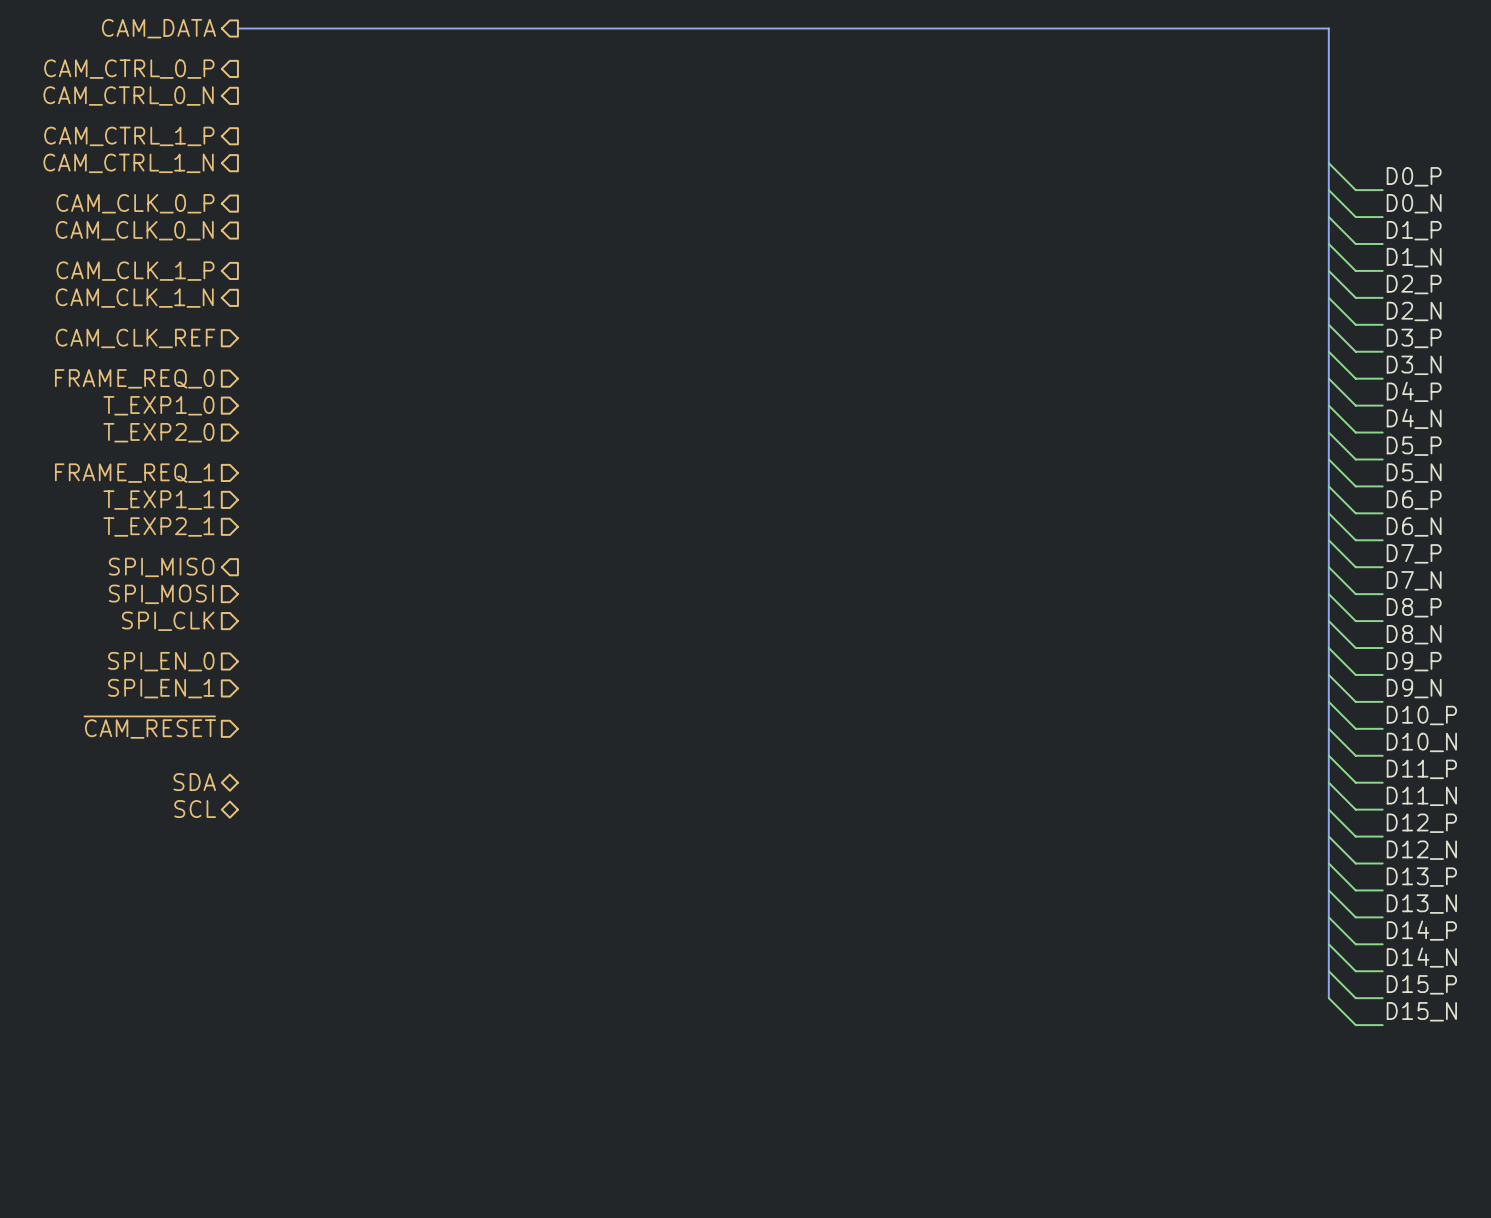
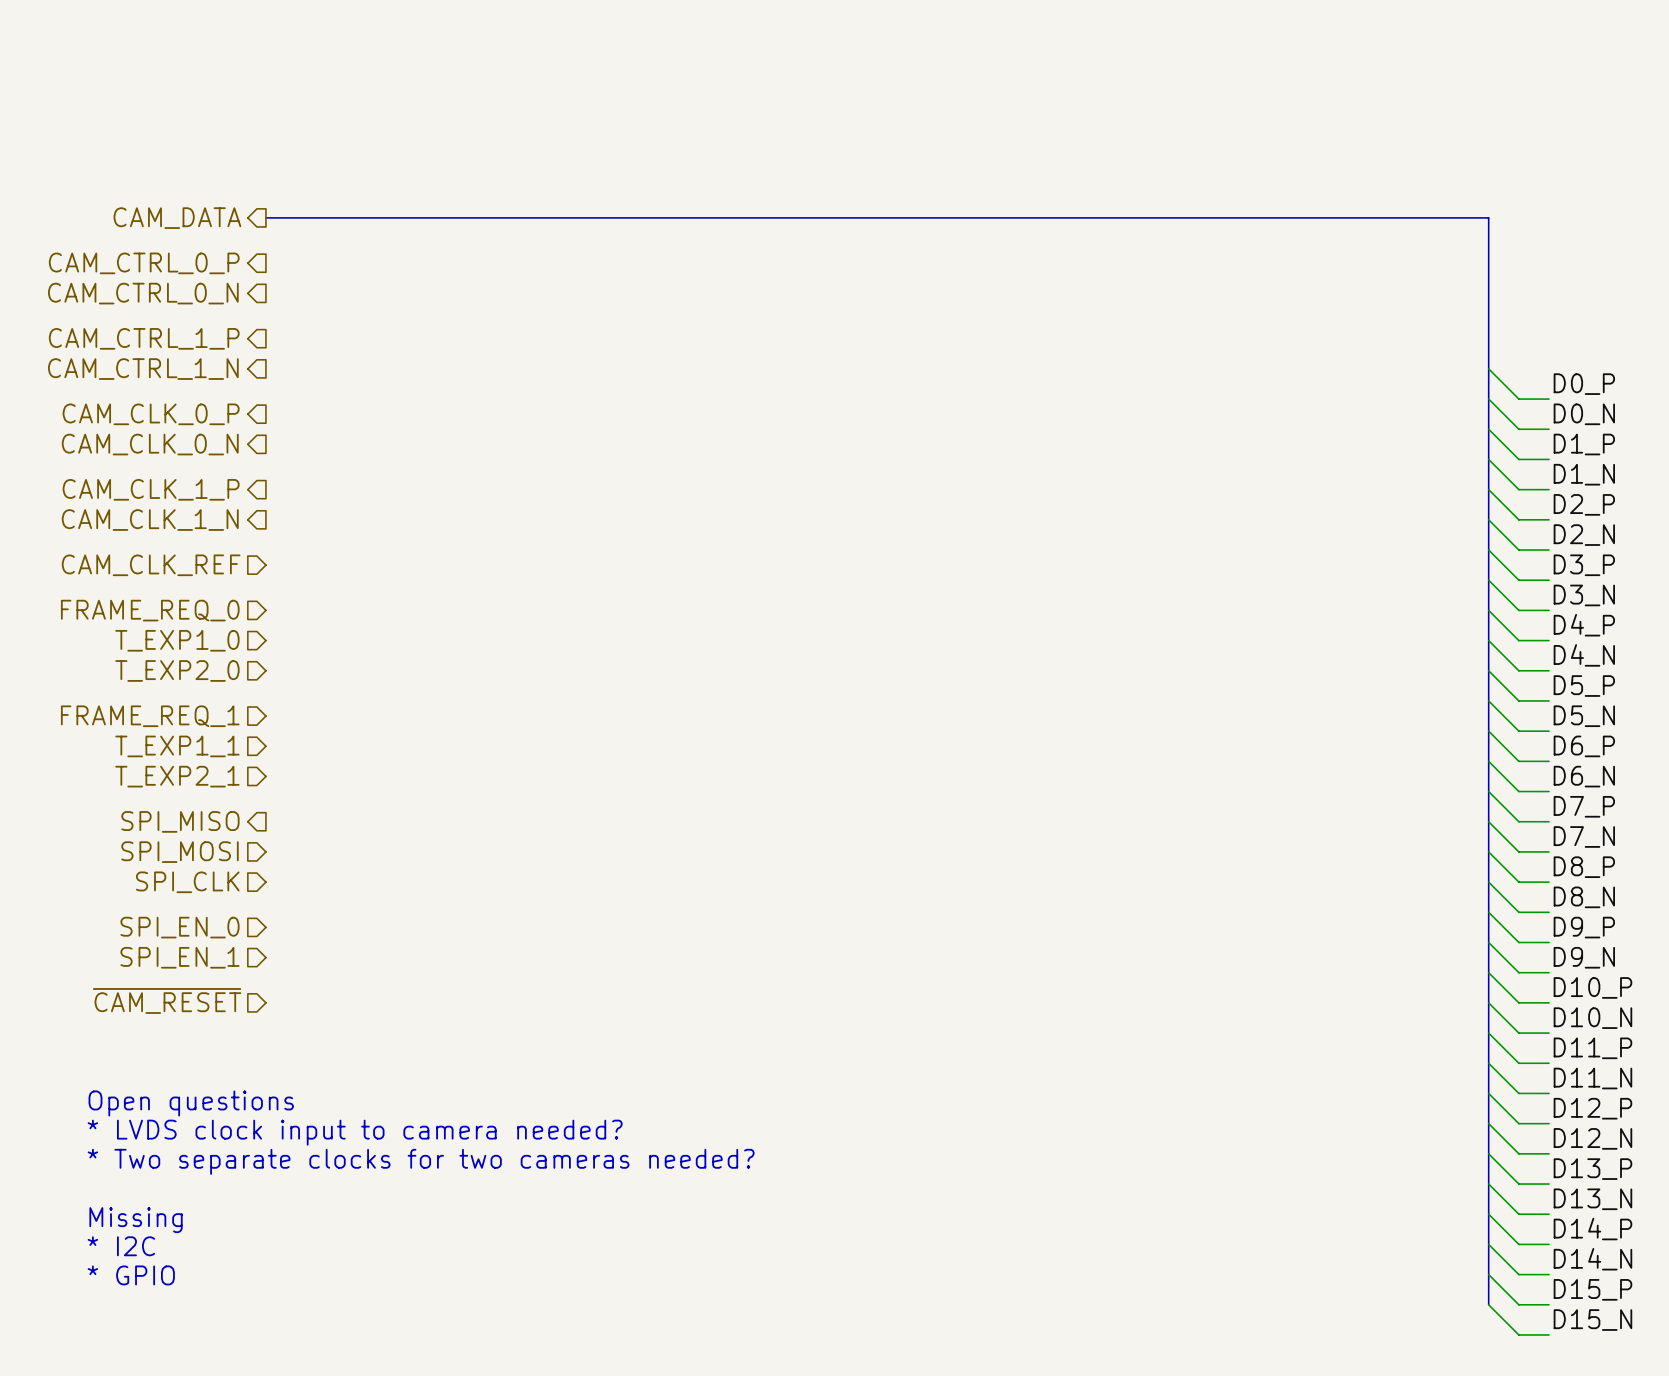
hierarchical label position: CAM_DATA (158, 28) -> CAM_DATA (177, 218)
bus: (237, 28) (1328, 28) (1328, 190) -> (265, 217) (1488, 217)
hierarchical label: CAM_CTRL_0_P (129, 69) -> none
hierarchical label position: CAM_CTRL_0_N (128, 96) -> CAM_CTRL_0_N (143, 293)
hierarchical label: CAM_CTRL_1_P (129, 136) -> none
hierarchical label position: CAM_CTRL_1_N (128, 163) -> CAM_CTRL_1_N (143, 369)
wire: (1328, 163) (1355, 190) (1382, 190) -> none
label: D0_P (1414, 176) -> none
wire: (1328, 190) (1355, 217) (1382, 217) -> none
hierarchical label position: CAM_CLK_0_P (135, 203) -> CAM_CLK_0_P (151, 414)
label: D0_N (1414, 203) -> none
wire: (1328, 217) (1355, 243) (1382, 243) -> none
hierarchical label: CAM_CLK_0_N (134, 230) -> CAM_CTRL_0_P (144, 263)
label: D1_P (1414, 230) -> none
wire: (1328, 243) (1355, 270) (1382, 270) -> none
label: D1_N (1414, 257) -> none
wire: (1328, 270) (1355, 297) (1382, 297) -> none
hierarchical label: CAM_CLK_1_P (135, 271) -> none
label: D2_P (1414, 284) -> none
wire: (1328, 297) (1355, 324) (1382, 324) -> none
hierarchical label: CAM_CLK_1_N (134, 298) -> CAM_CTRL_1_P (144, 338)
label: D2_N (1414, 311) -> none
hierarchical label: CAM_CLK_REF (135, 338) -> none
label: D3_P (1414, 338) -> D0_P (1584, 384)
label: D3_N (1414, 365) -> D0_N (1584, 414)
hierarchical label position: FRAME_REQ_0 (134, 378) -> FRAME_REQ_0 (150, 610)
label: D4_P (1414, 391) -> D1_P (1584, 444)
hierarchical label: none -> CAM_CLK_0_N (150, 444)
hierarchical label: T_EXP1_0 (158, 405) -> none
label: D4_N (1414, 418) -> D1_N (1584, 474)
hierarchical label shape: input (158, 432) -> output (151, 489)
hierarchical label: T_EXP2_0 (158, 432) -> CAM_CLK_1_P (151, 489)
label: D5_P (1414, 446) -> D2_P (1584, 504)
hierarchical label: none -> CAM_CLK_1_N (150, 520)
hierarchical label position: FRAME_REQ_1 (134, 473) -> FRAME_REQ_1 (150, 716)
label: D5_N (1414, 473) -> D2_N (1584, 535)
hierarchical label: T_EXP1_1 (158, 500) -> CAM_CLK_REF (151, 565)
label: D6_P (1414, 500) -> D3_P (1584, 565)
hierarchical label: T_EXP2_1 (158, 526) -> none
label: D6_N (1414, 526) -> D3_N (1584, 595)
label: D7_P (1414, 553) -> D4_P (1584, 625)
hierarchical label shape: output (161, 567) -> input (177, 640)
hierarchical label: SPI_MISO (161, 567) -> T_EXP1_0 (177, 640)
label: D7_N (1414, 580) -> D4_N (1584, 655)
hierarchical label: SPI_MOSI (161, 594) -> T_EXP2_0 (177, 670)
label: D8_P (1414, 607) -> D5_P (1584, 686)
hierarchical label: SPI_CLK (168, 621) -> none
label: D8_N (1414, 634) -> D5_N (1584, 716)
hierarchical label: SPI_EN_0 (161, 661) -> T_EXP1_1 (177, 746)
label: D9_P (1414, 661) -> D6_P (1584, 746)
hierarchical label: SPI_EN_1 (161, 688) -> T_EXP2_1 (177, 776)
label: D9_N (1414, 688) -> D6_N (1584, 776)
label: D10_P (1421, 715) -> D7_P (1584, 806)
hierarchical label shape: input (149, 727) -> output (180, 821)
hierarchical label: ~{CAM_RESET} (149, 727) -> SPI_MISO (180, 821)
label: D10_N (1421, 742) -> D7_N (1584, 836)
hierarchical label: none -> SPI_MOSI (180, 852)
label: D11_P (1421, 769) -> D8_P (1584, 867)
hierarchical label shape: bidirectional (194, 782) -> input (187, 882)
hierarchical label: SDA (194, 782) -> SPI_CLK (187, 882)
label: D11_N (1421, 796) -> D8_N (1584, 897)
hierarchical label: SCL (195, 809) -> none
hierarchical label: none -> SPI_EN_0 (180, 927)
label: D12_P (1421, 823) -> D9_P (1584, 927)
hierarchical label: none -> SPI_EN_1 (180, 957)
label: D12_N (1421, 850) -> D9_N (1584, 957)
label: D13_P (1421, 877) -> D10_P (1592, 987)
hierarchical label: none -> ~{CAM_RESET} (167, 1000)
label: D13_N (1421, 904) -> D10_N (1592, 1018)
label: D14_P (1421, 930) -> D11_P (1592, 1048)
label: D14_N (1421, 957) -> D11_N (1592, 1078)
text: none -> Open questions (191, 1103)
label: D15_P (1421, 984) -> D12_P (1592, 1108)
bus: none -> (1488, 1123) (1488, 1304)
text: none -> * LVDS clock input to camera needed? (355, 1132)
label: D15_N (1421, 1011) -> D12_N (1592, 1138)
wire: none -> (1488, 1153) (1518, 1184) (1549, 1184)
text: none -> * Two separate clocks for two cameras needed? (421, 1161)
label: none -> D13_P (1592, 1169)
wire: none -> (1488, 1184) (1518, 1214) (1549, 1214)
label: none -> D13_N (1592, 1199)
wire: none -> (1488, 1214) (1518, 1244) (1549, 1244)
text: none -> Missing (136, 1220)
label: none -> D14_P (1592, 1229)
wire: none -> (1488, 1244) (1518, 1274) (1549, 1274)
text: none -> * I2C (121, 1246)
label: none -> D14_N (1592, 1259)
wire: none -> (1488, 1274) (1518, 1304) (1549, 1304)
text: none -> * GPIO (131, 1275)
label: none -> D15_P (1592, 1289)
wire: none -> (1488, 1304) (1518, 1334) (1549, 1334)
label: none -> D15_N (1592, 1320)

